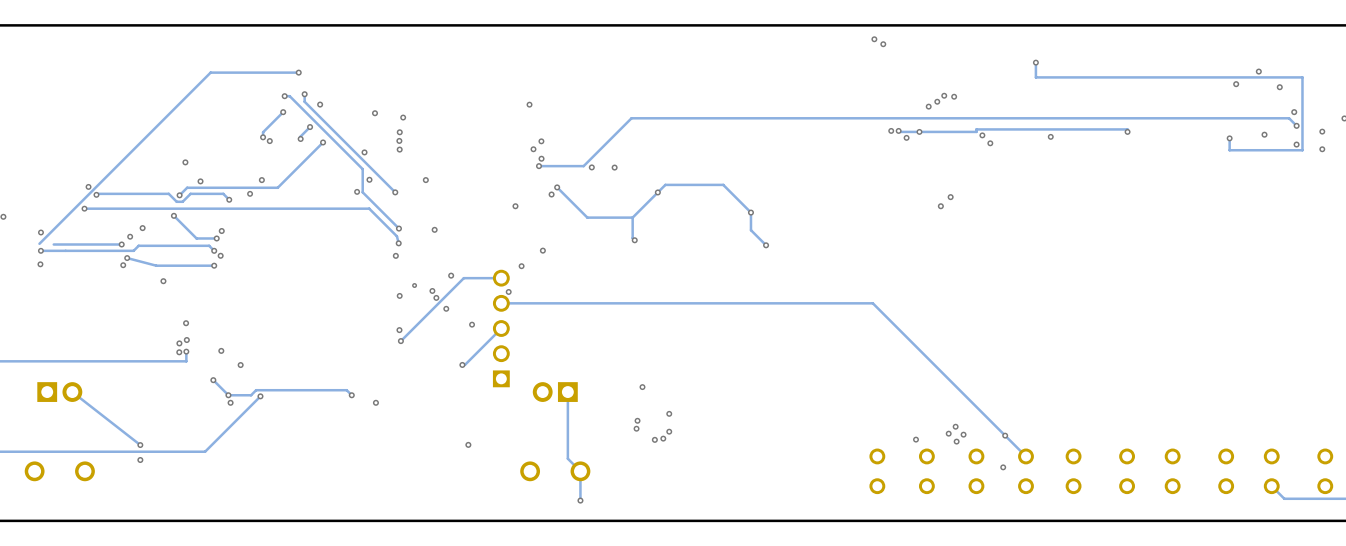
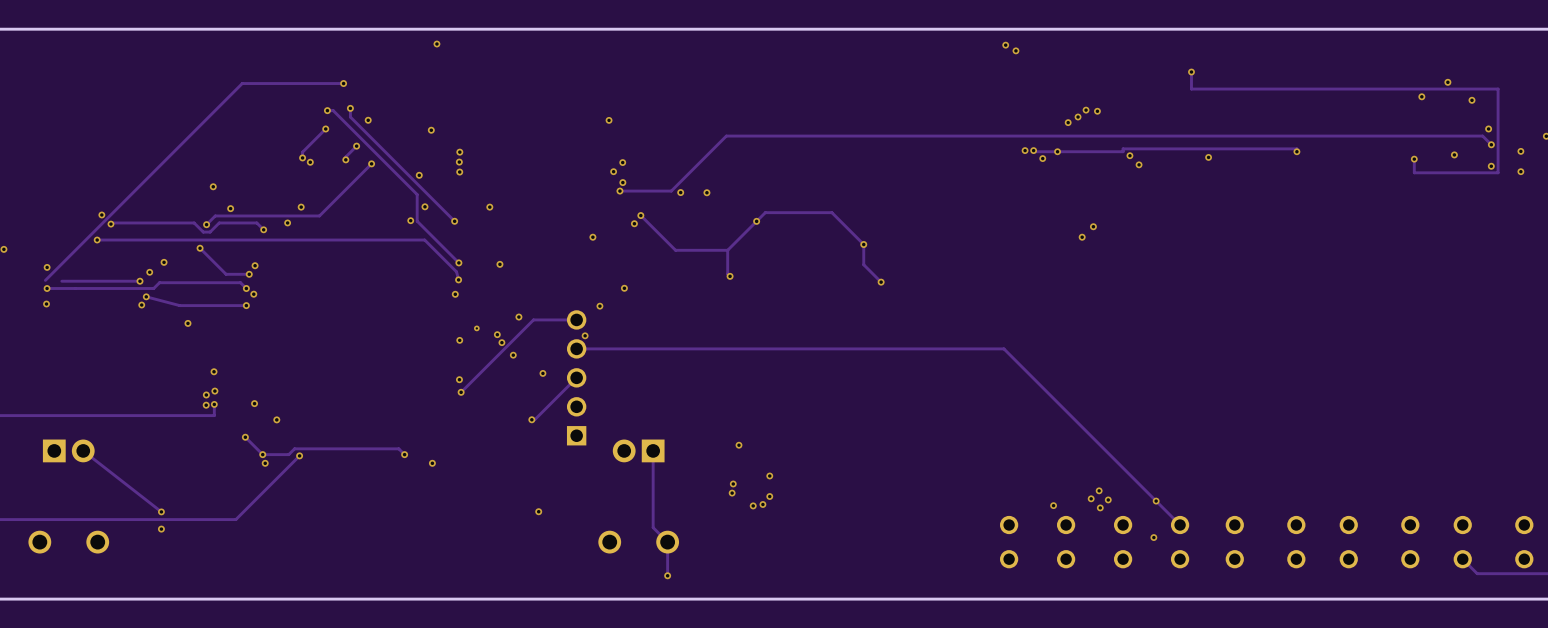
via: none -> (436, 44)
via: (403, 117) -> none

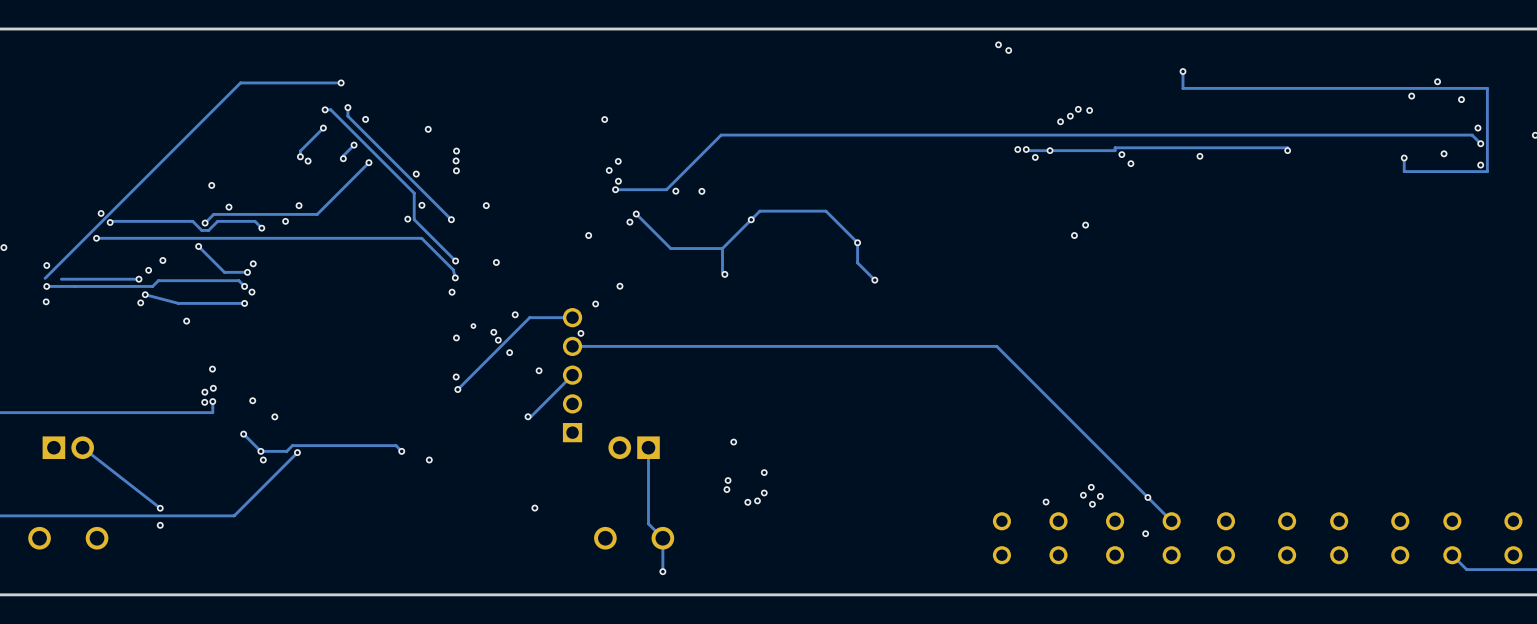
via: (436, 44) -> none
via: (1520, 151) -> none
via: (1520, 171) -> none

